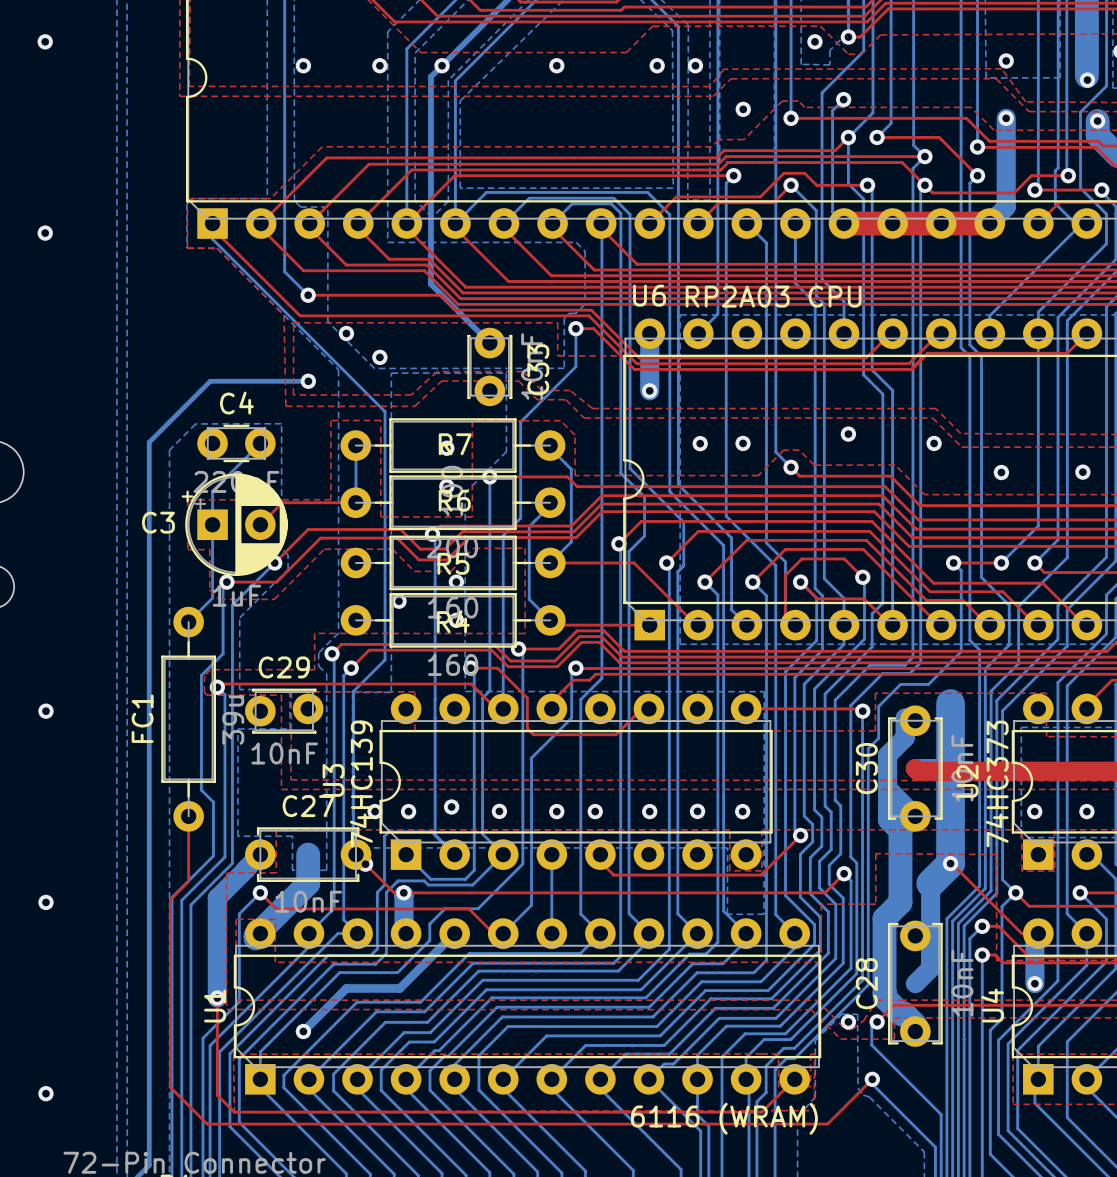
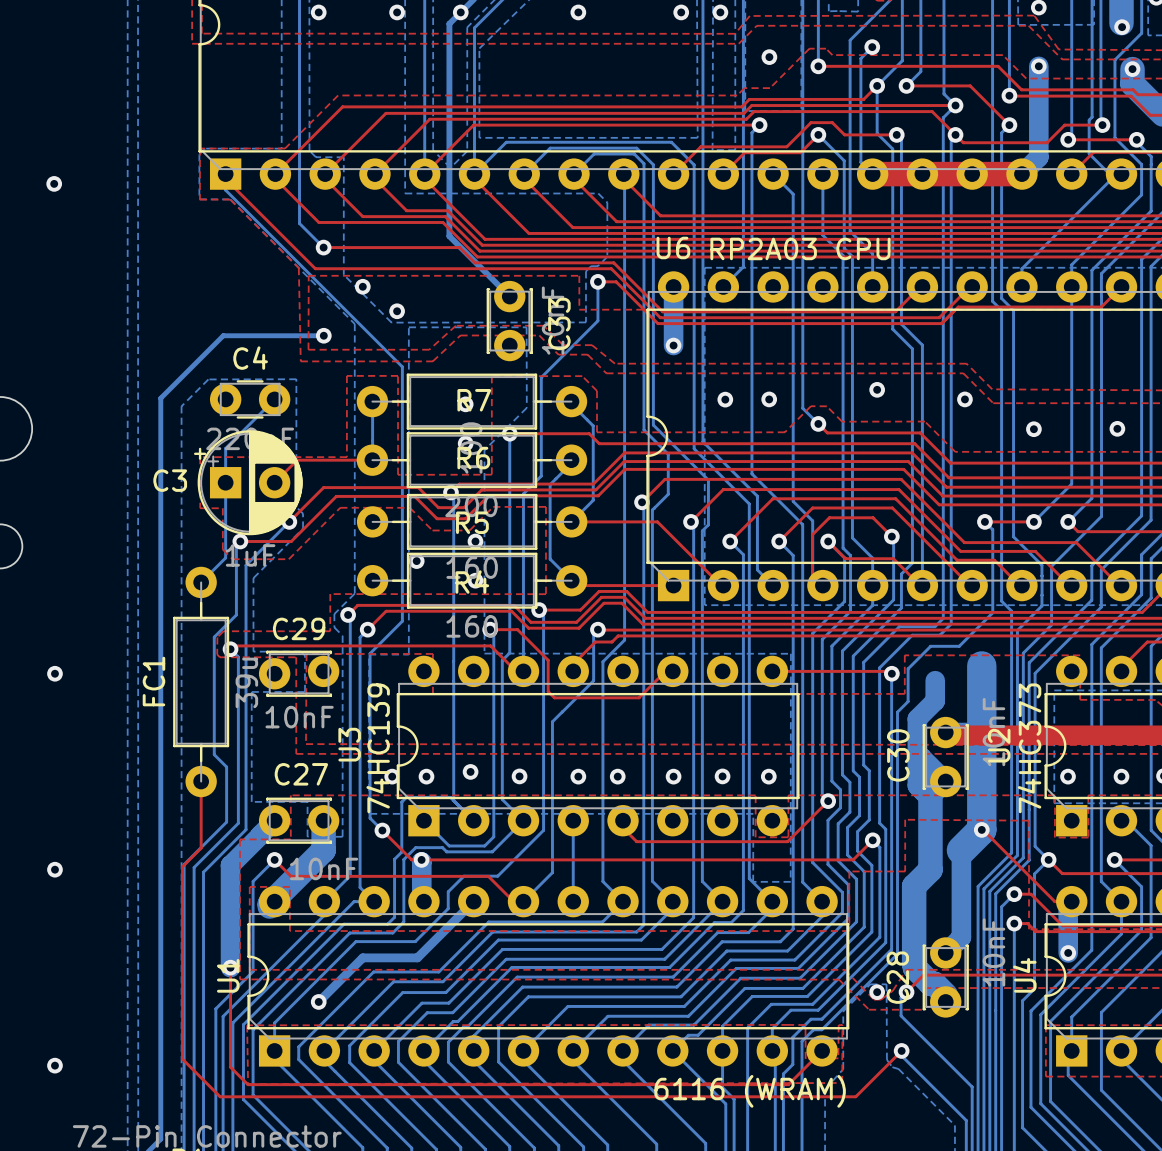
C30 footprint: [888, 705, 943, 832] -> [922, 716, 969, 798]
C27 footprint: [245, 827, 372, 882] -> [258, 797, 340, 844]
C28 footprint: [888, 920, 943, 1047] -> [922, 937, 969, 1018]

